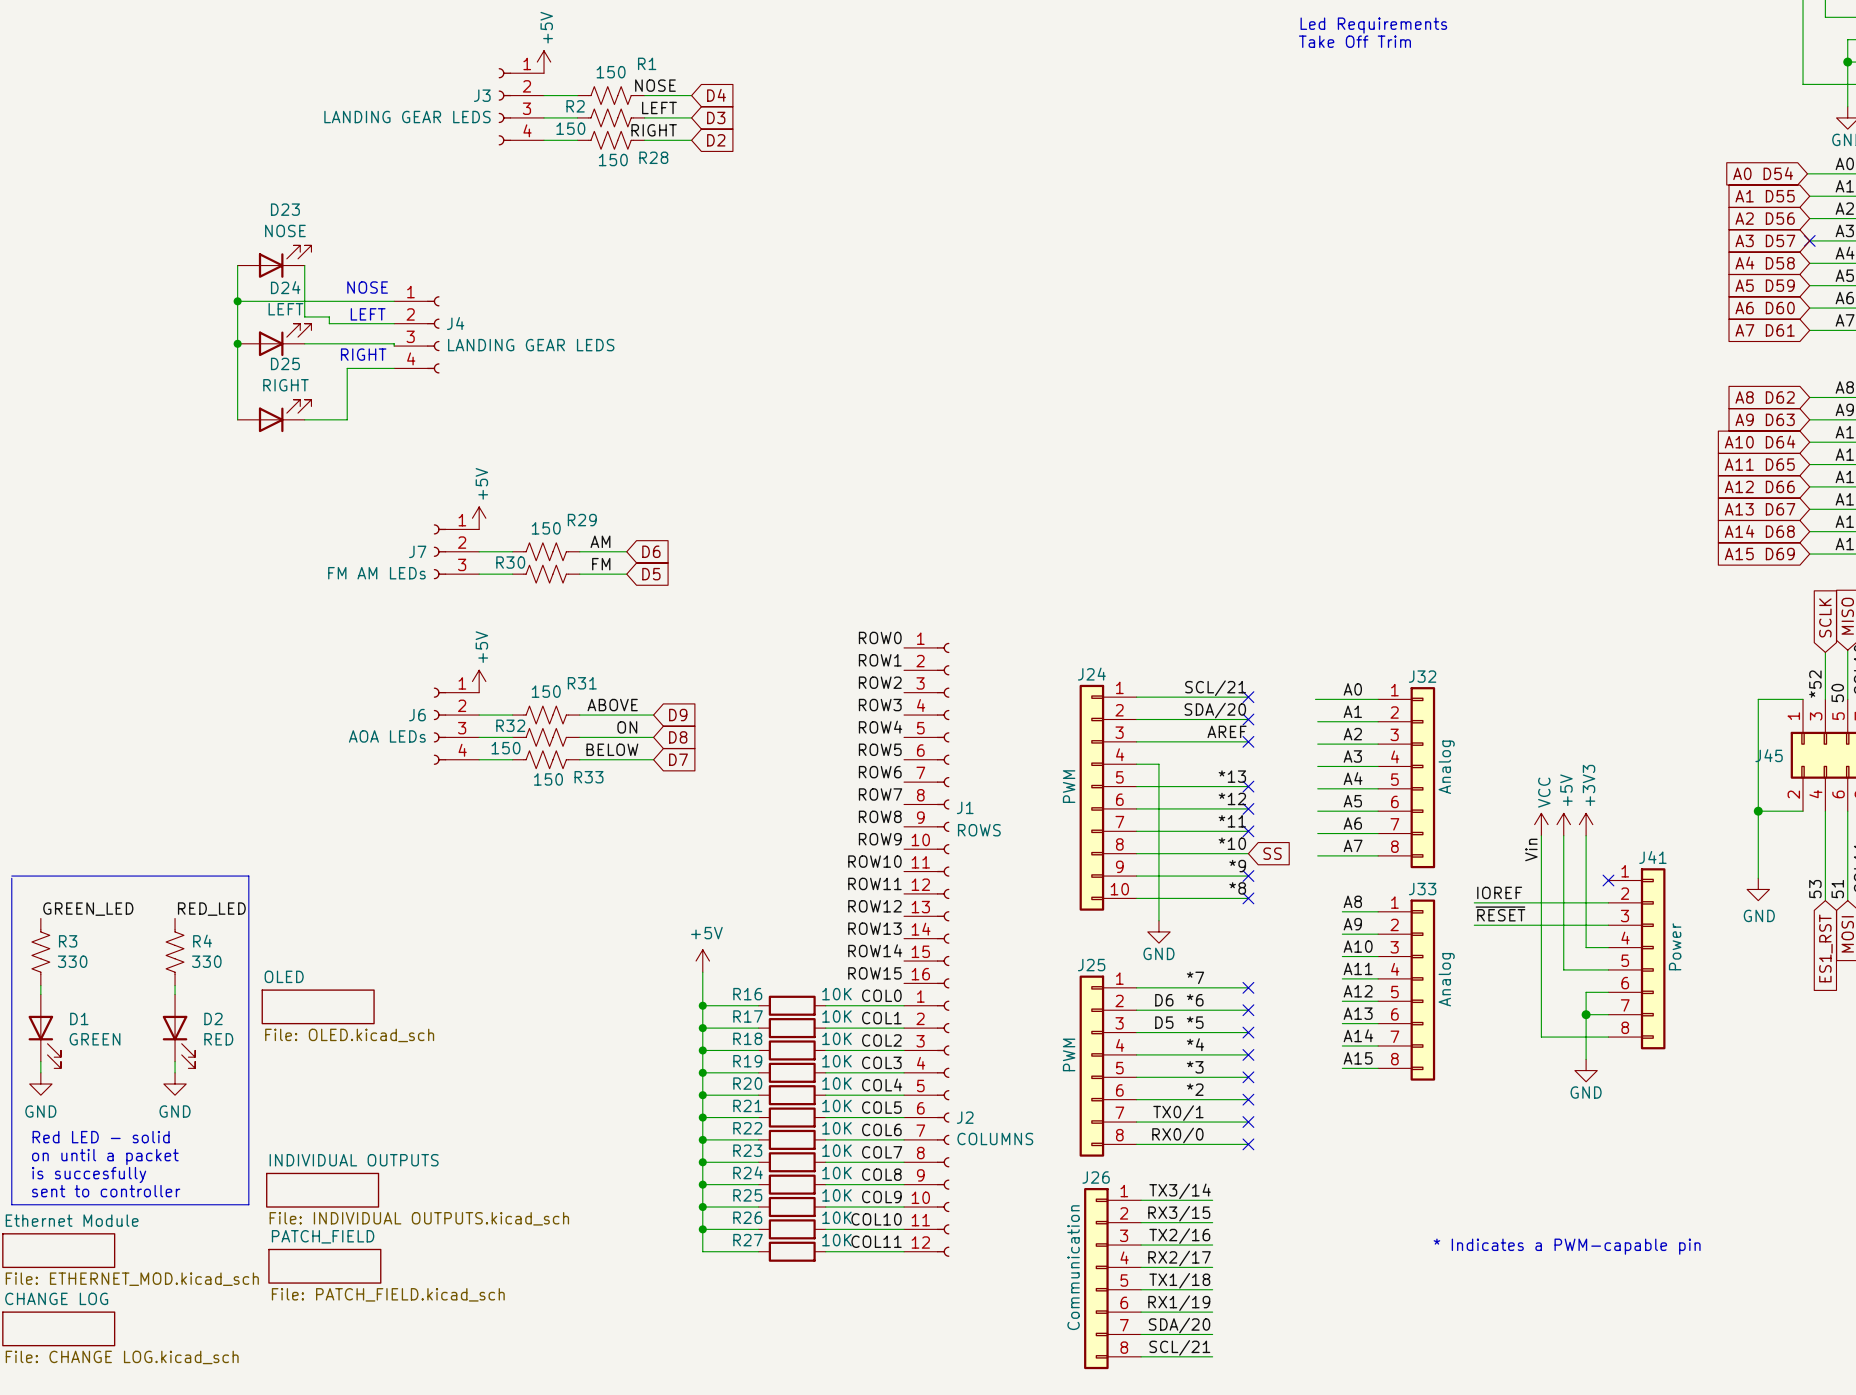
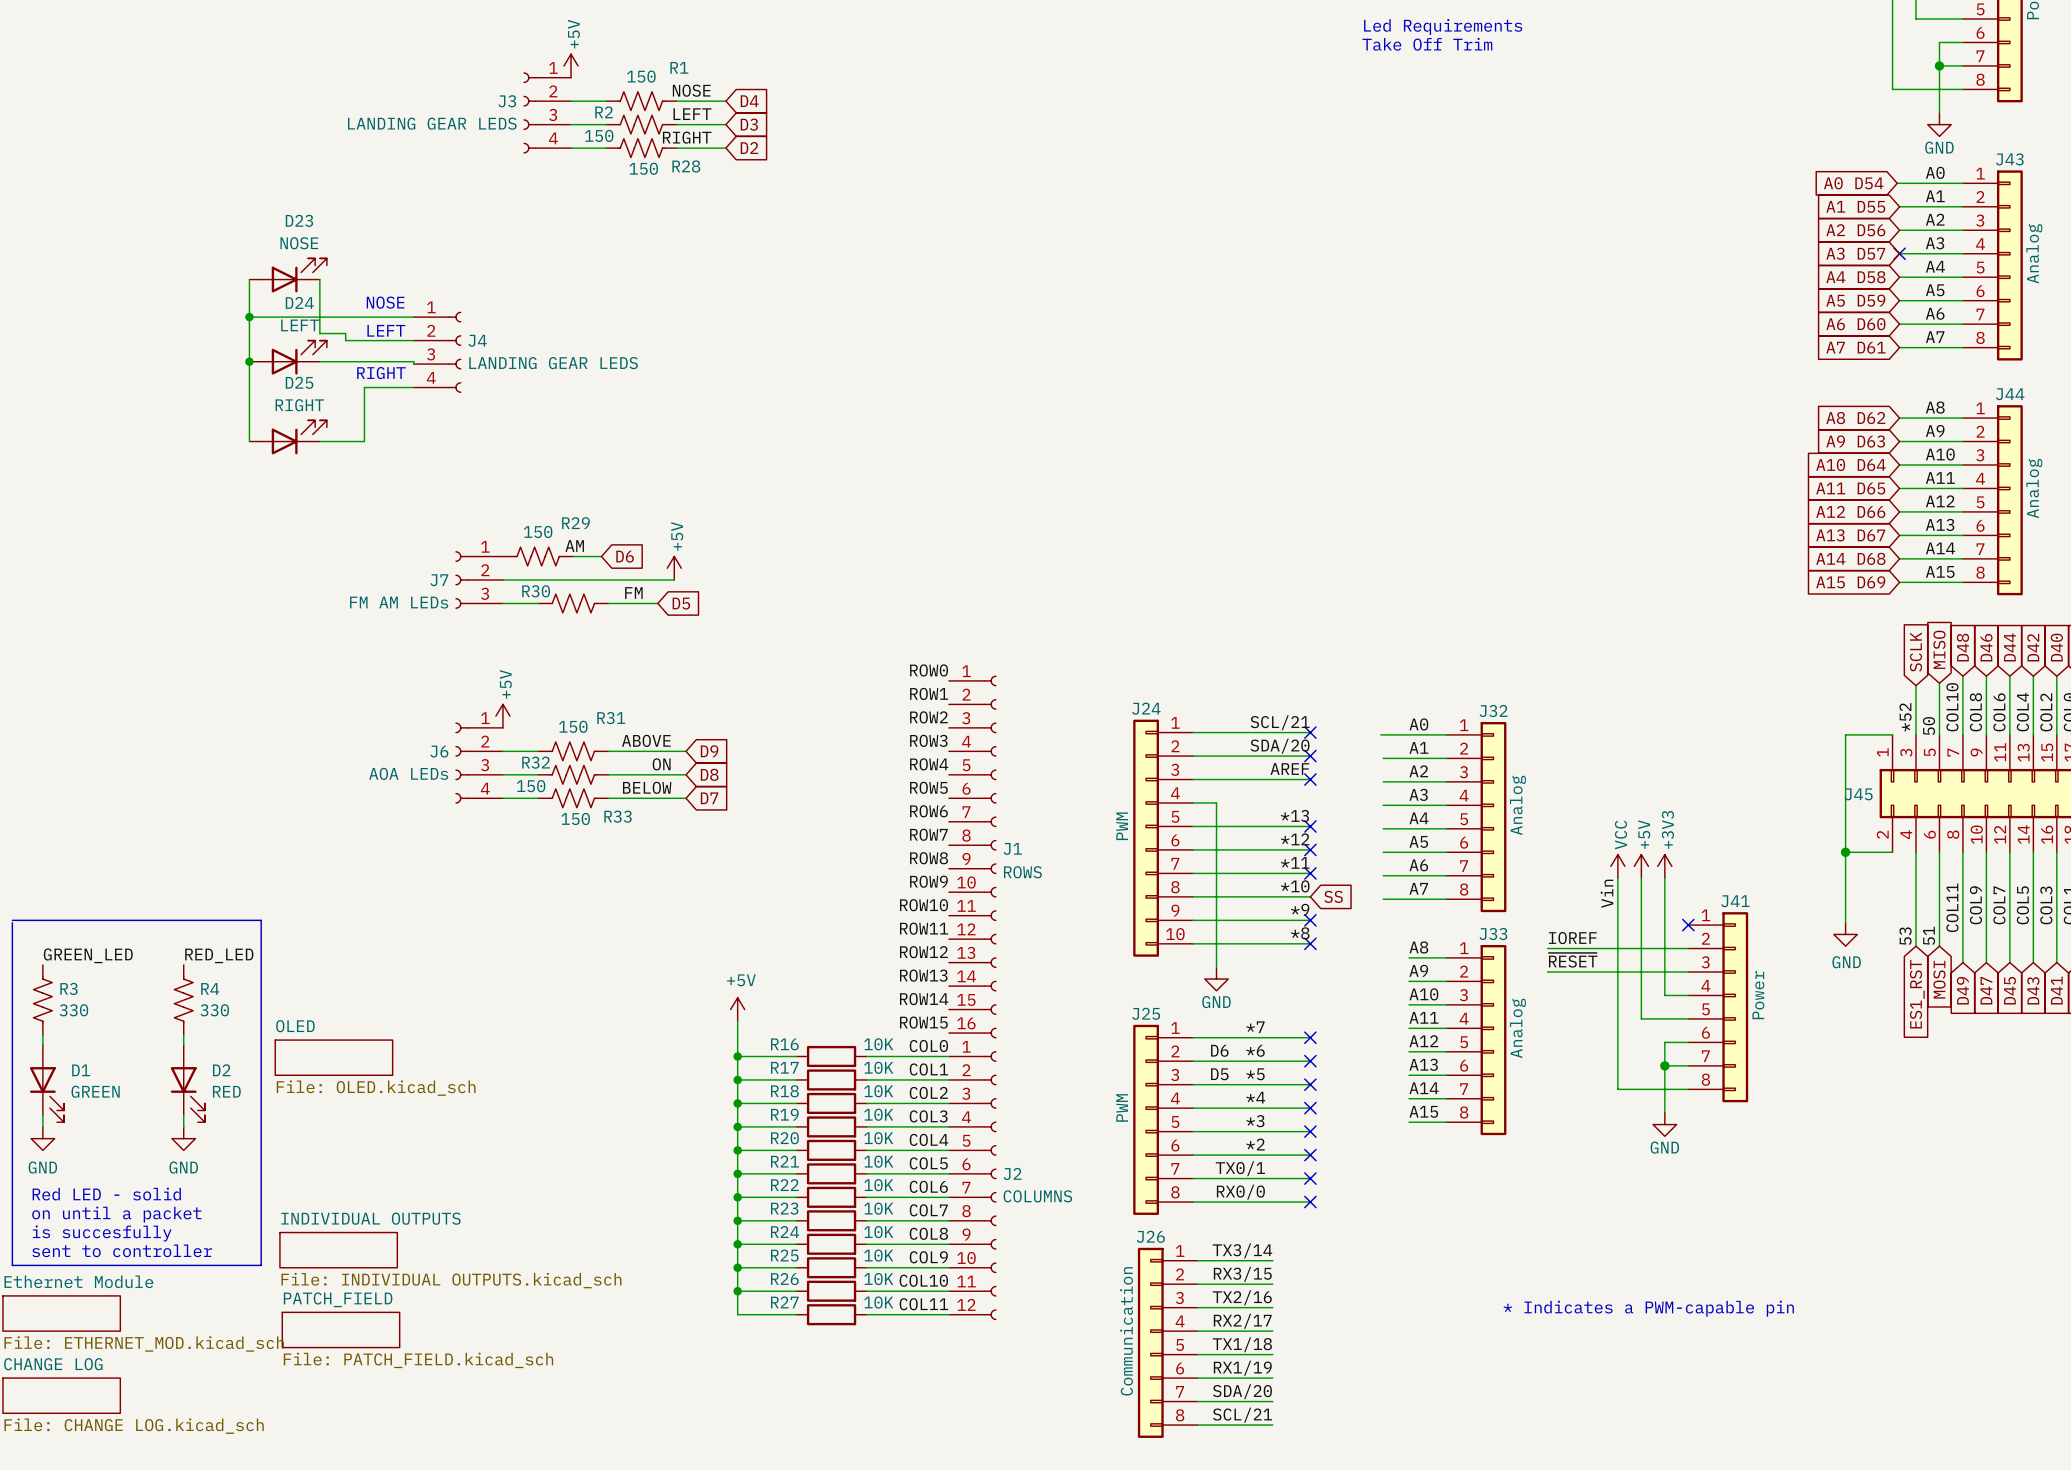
power symbol position: +5V (479, 518) -> +5V (674, 568)
wire: none -> (573, 556) (601, 556)
label position: AM (600, 541) -> AM (574, 546)
R29 position: (546, 551) -> (538, 556)
wire: none -> (657, 580) (674, 580)
global label position: D6 (651, 551) -> D6 (625, 556)

